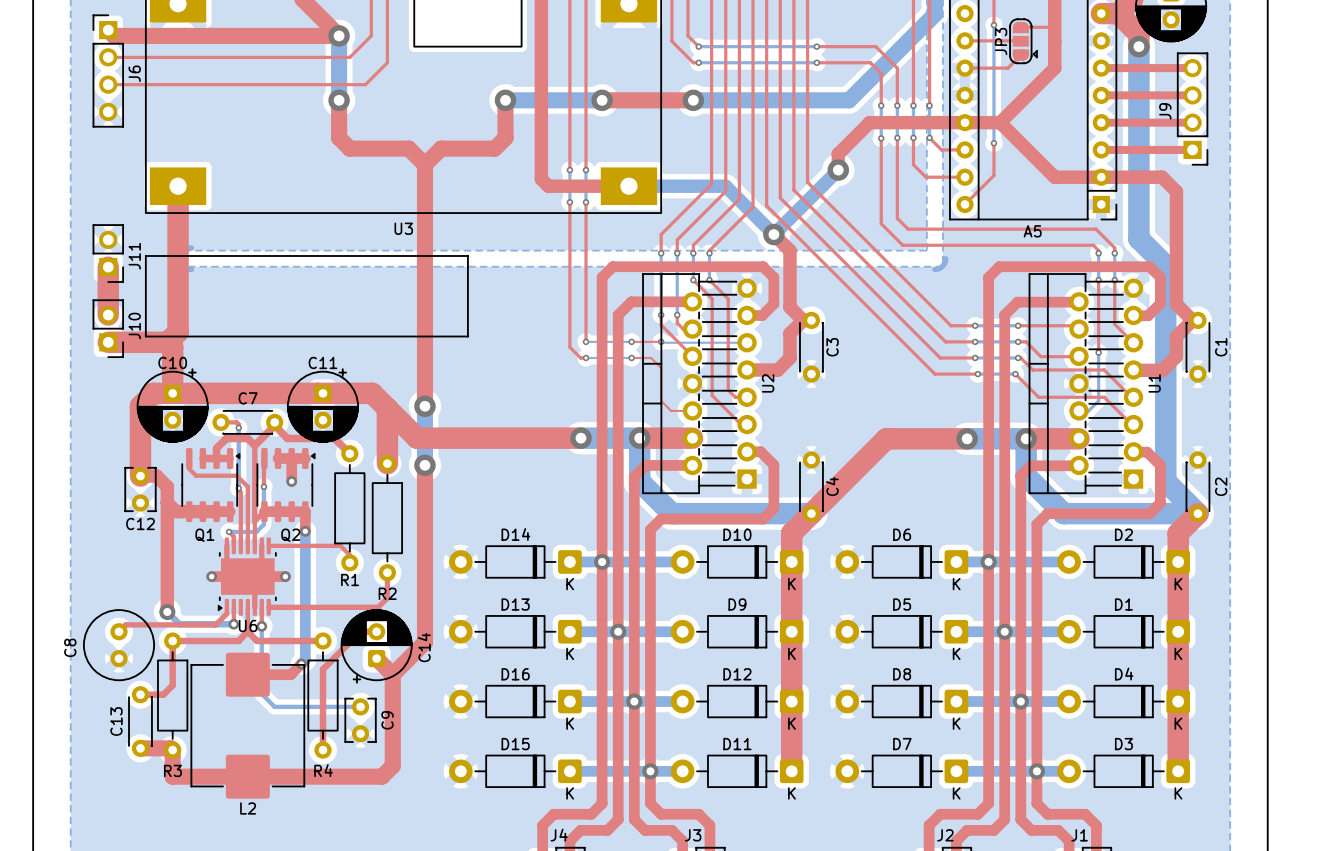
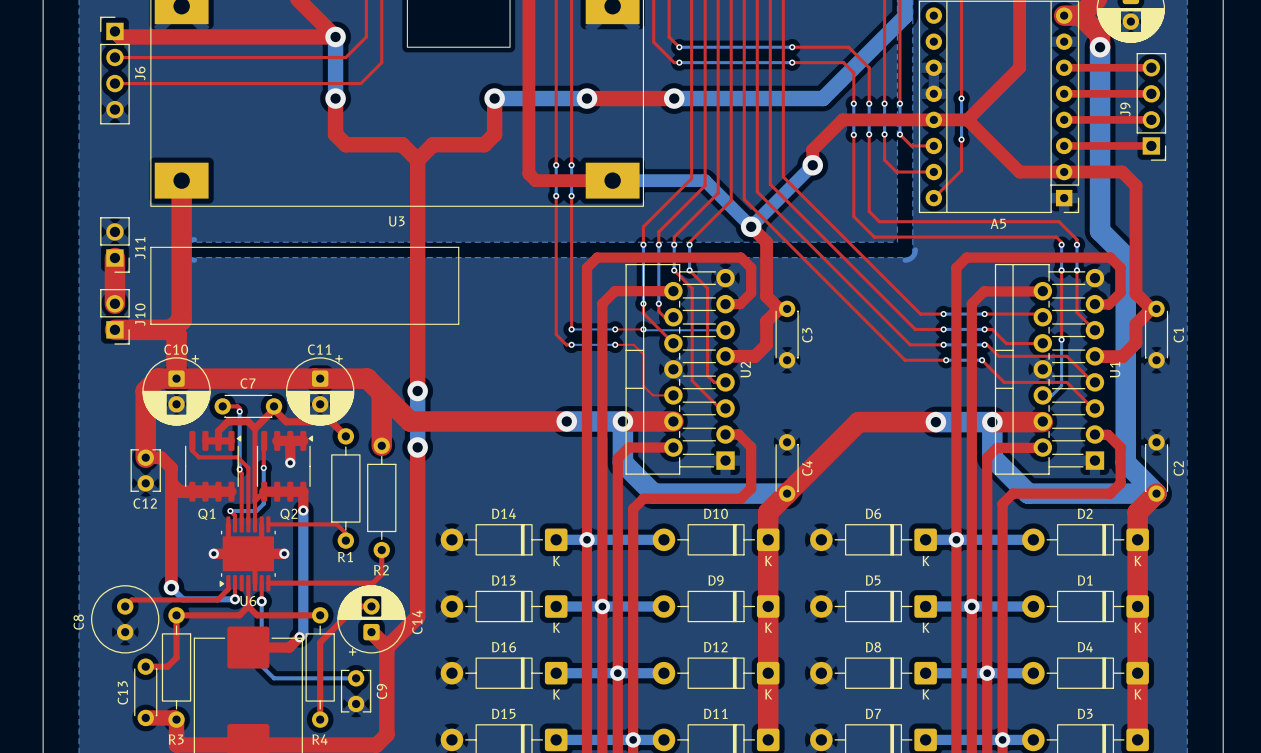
bottom track: (993, 25) (993, 100) -> none
top track: none -> (961, 26) (961, 98)
via: (993, 25) -> none
top track: (1020, 27) (1054, 27) -> none
top track: (964, 40) (1020, 40) -> none
JP3: (1023, 41) -> none
top track: (1020, 55) (1007, 68) (964, 68) -> none
via: none -> (961, 98)

